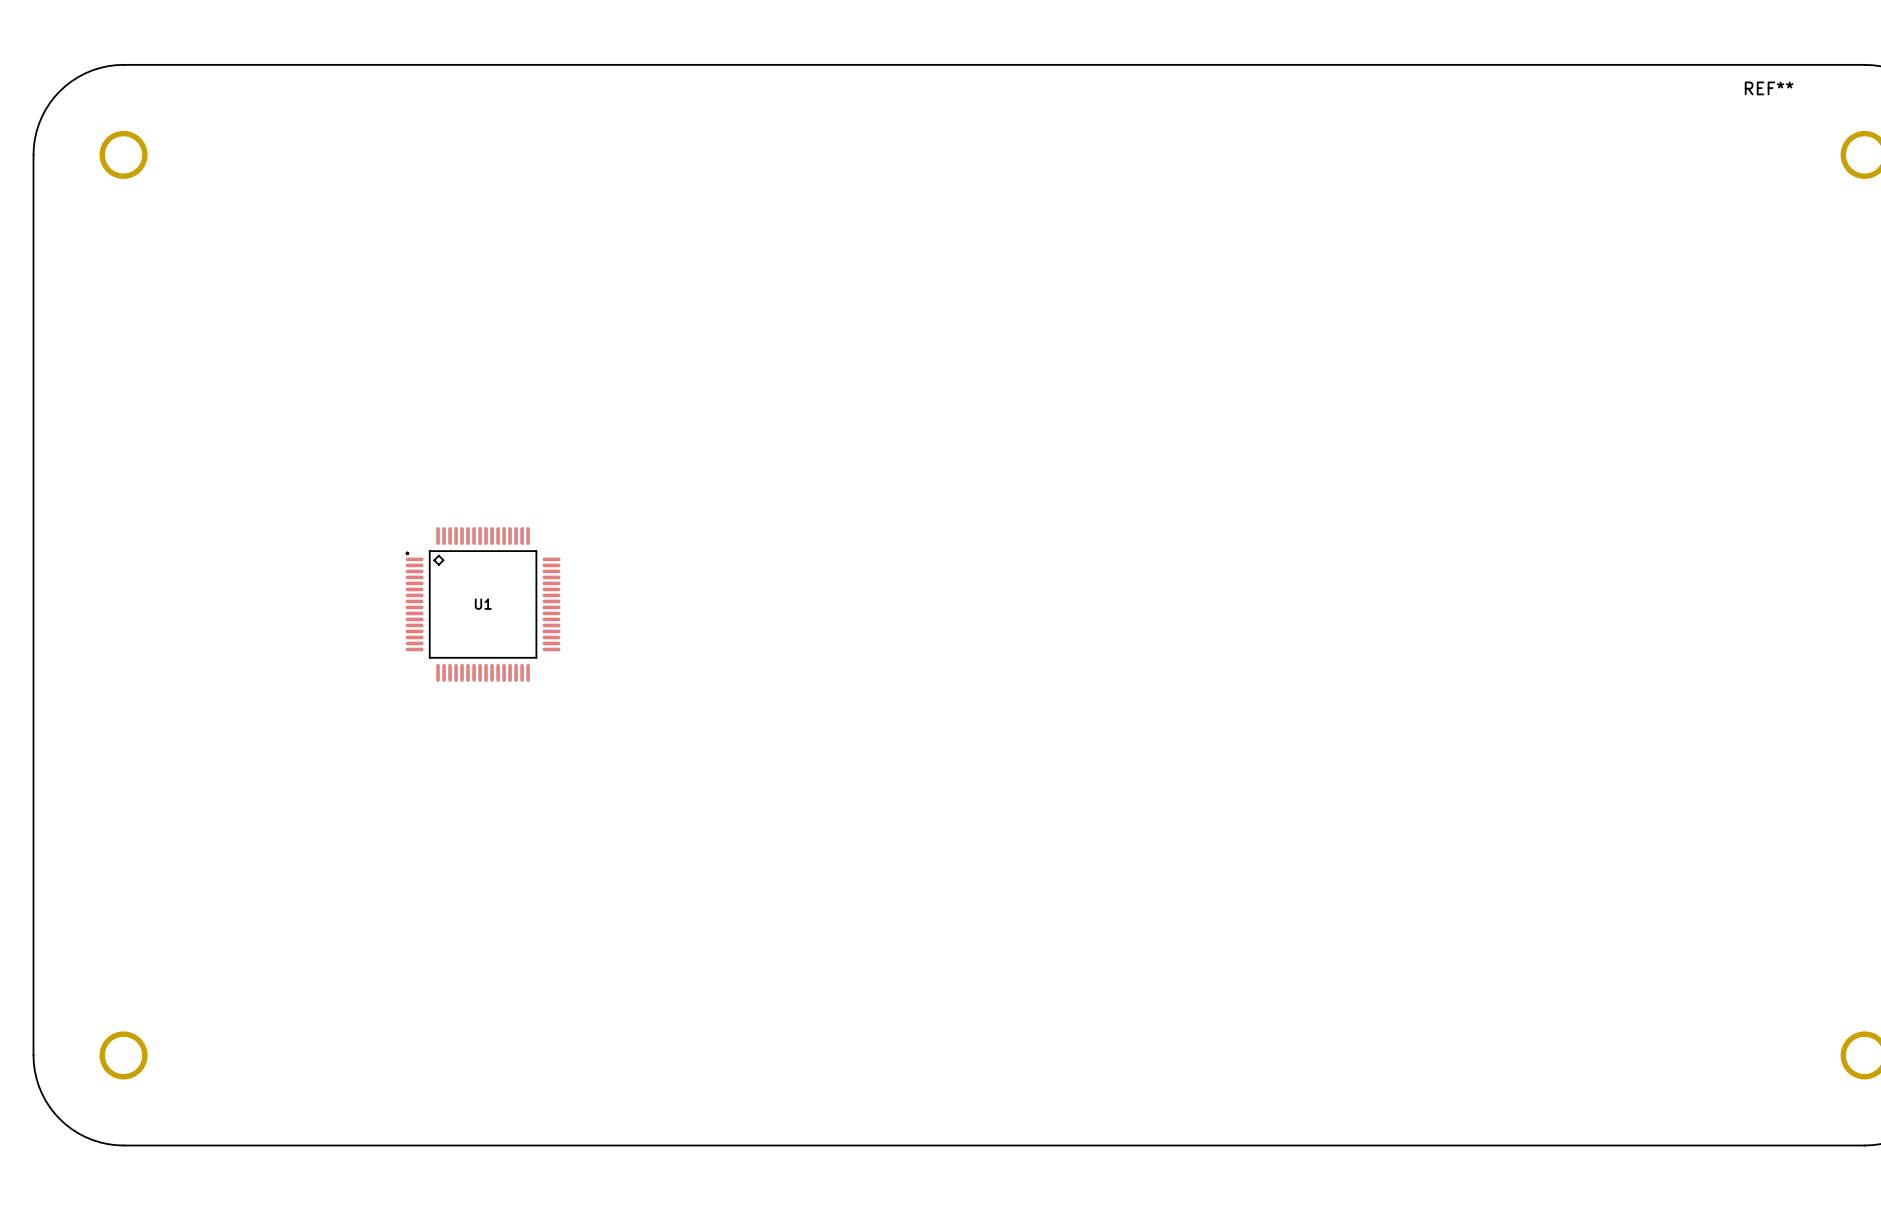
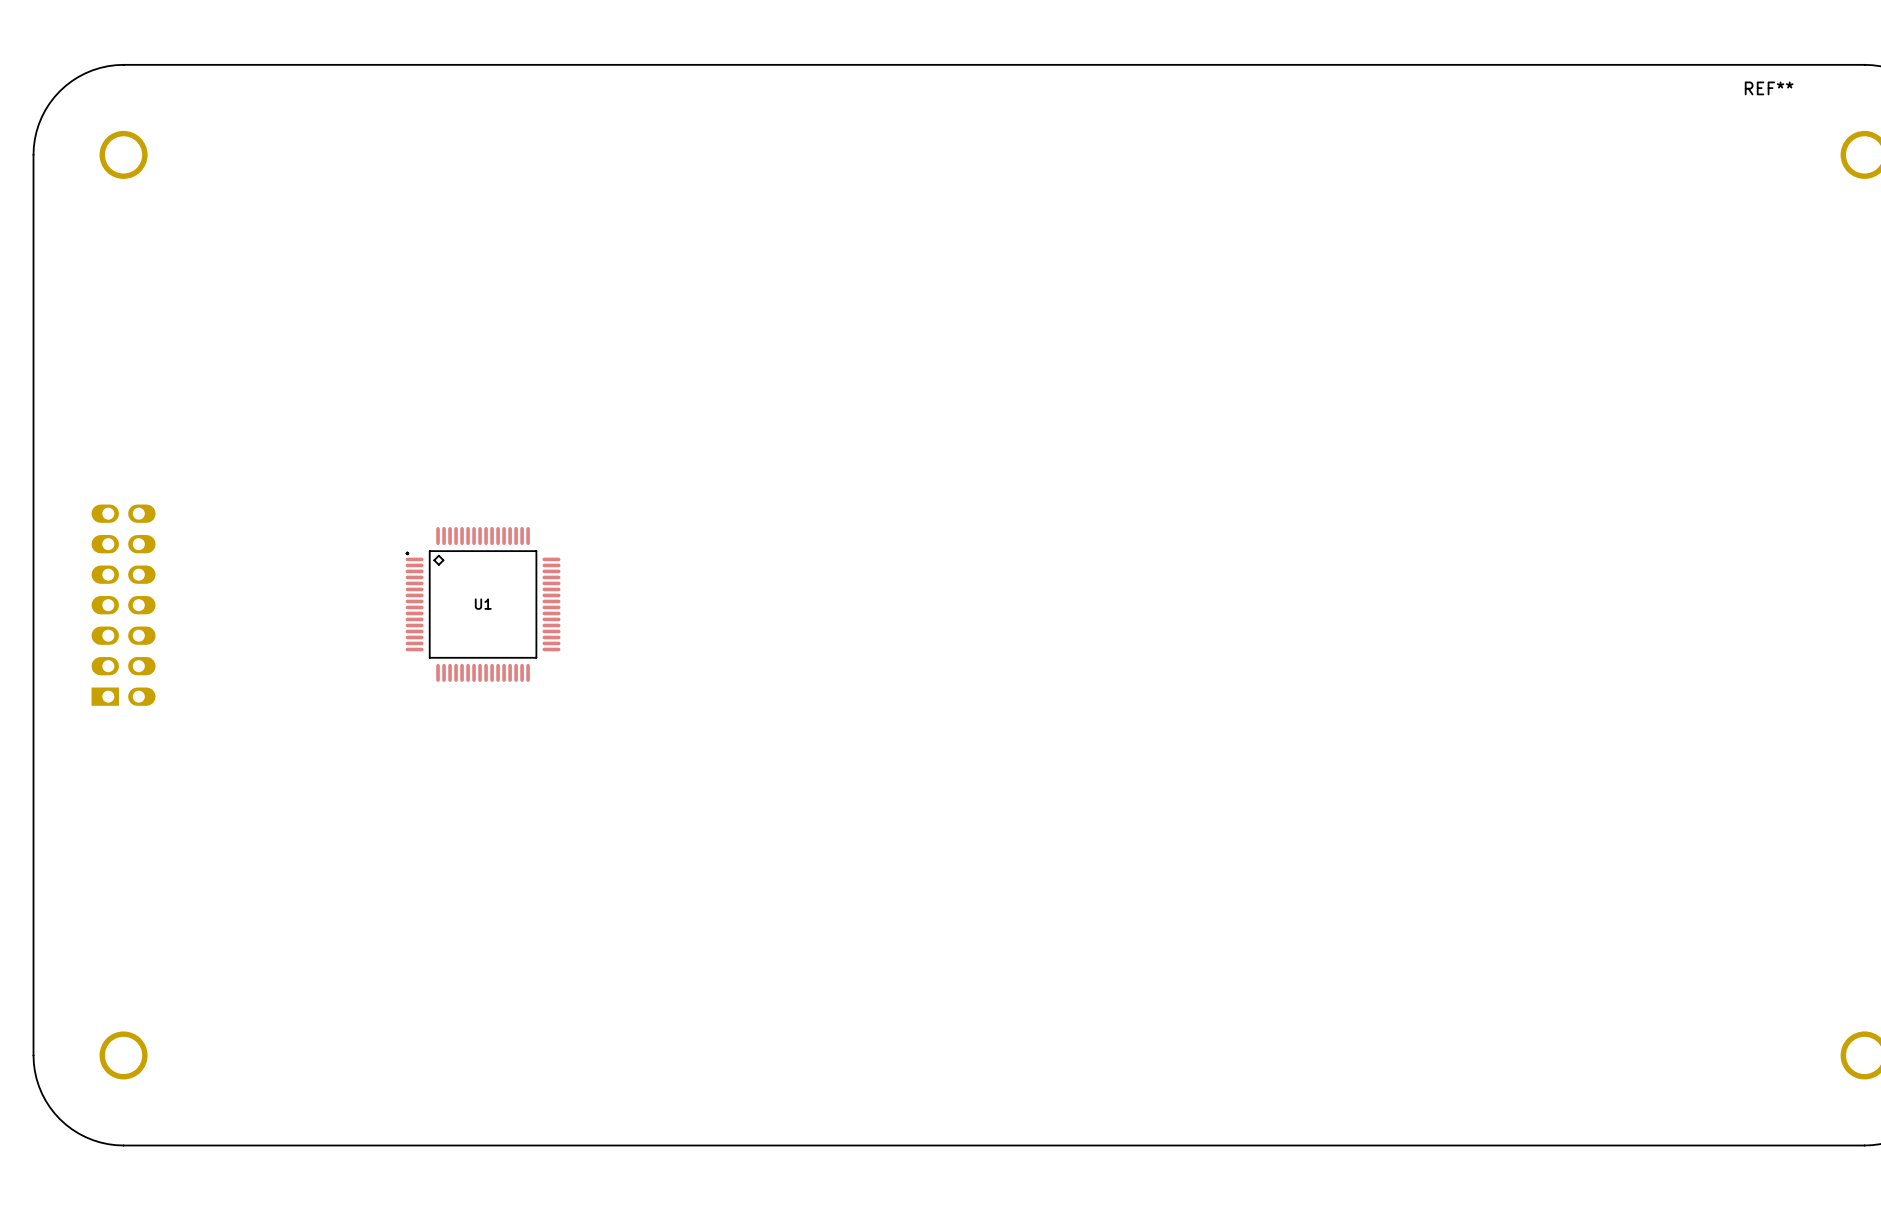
part: none -> (123, 605)

